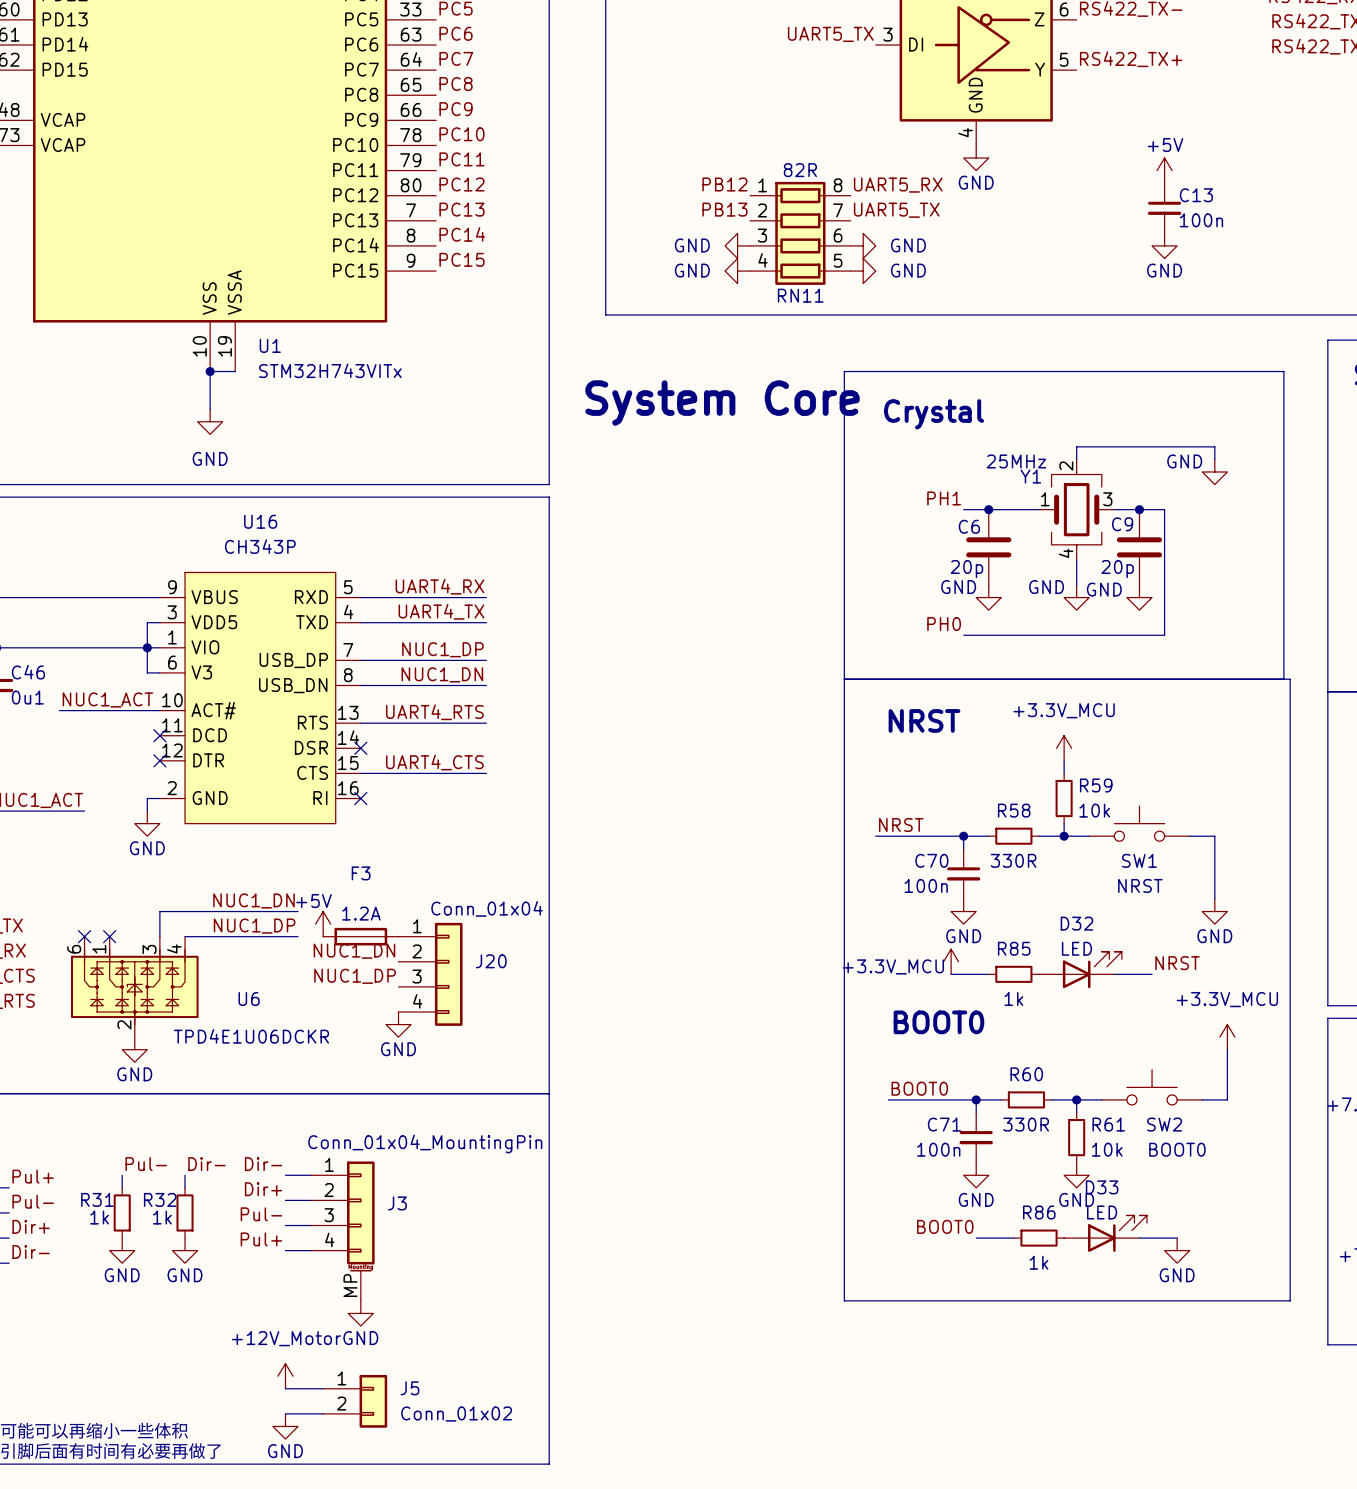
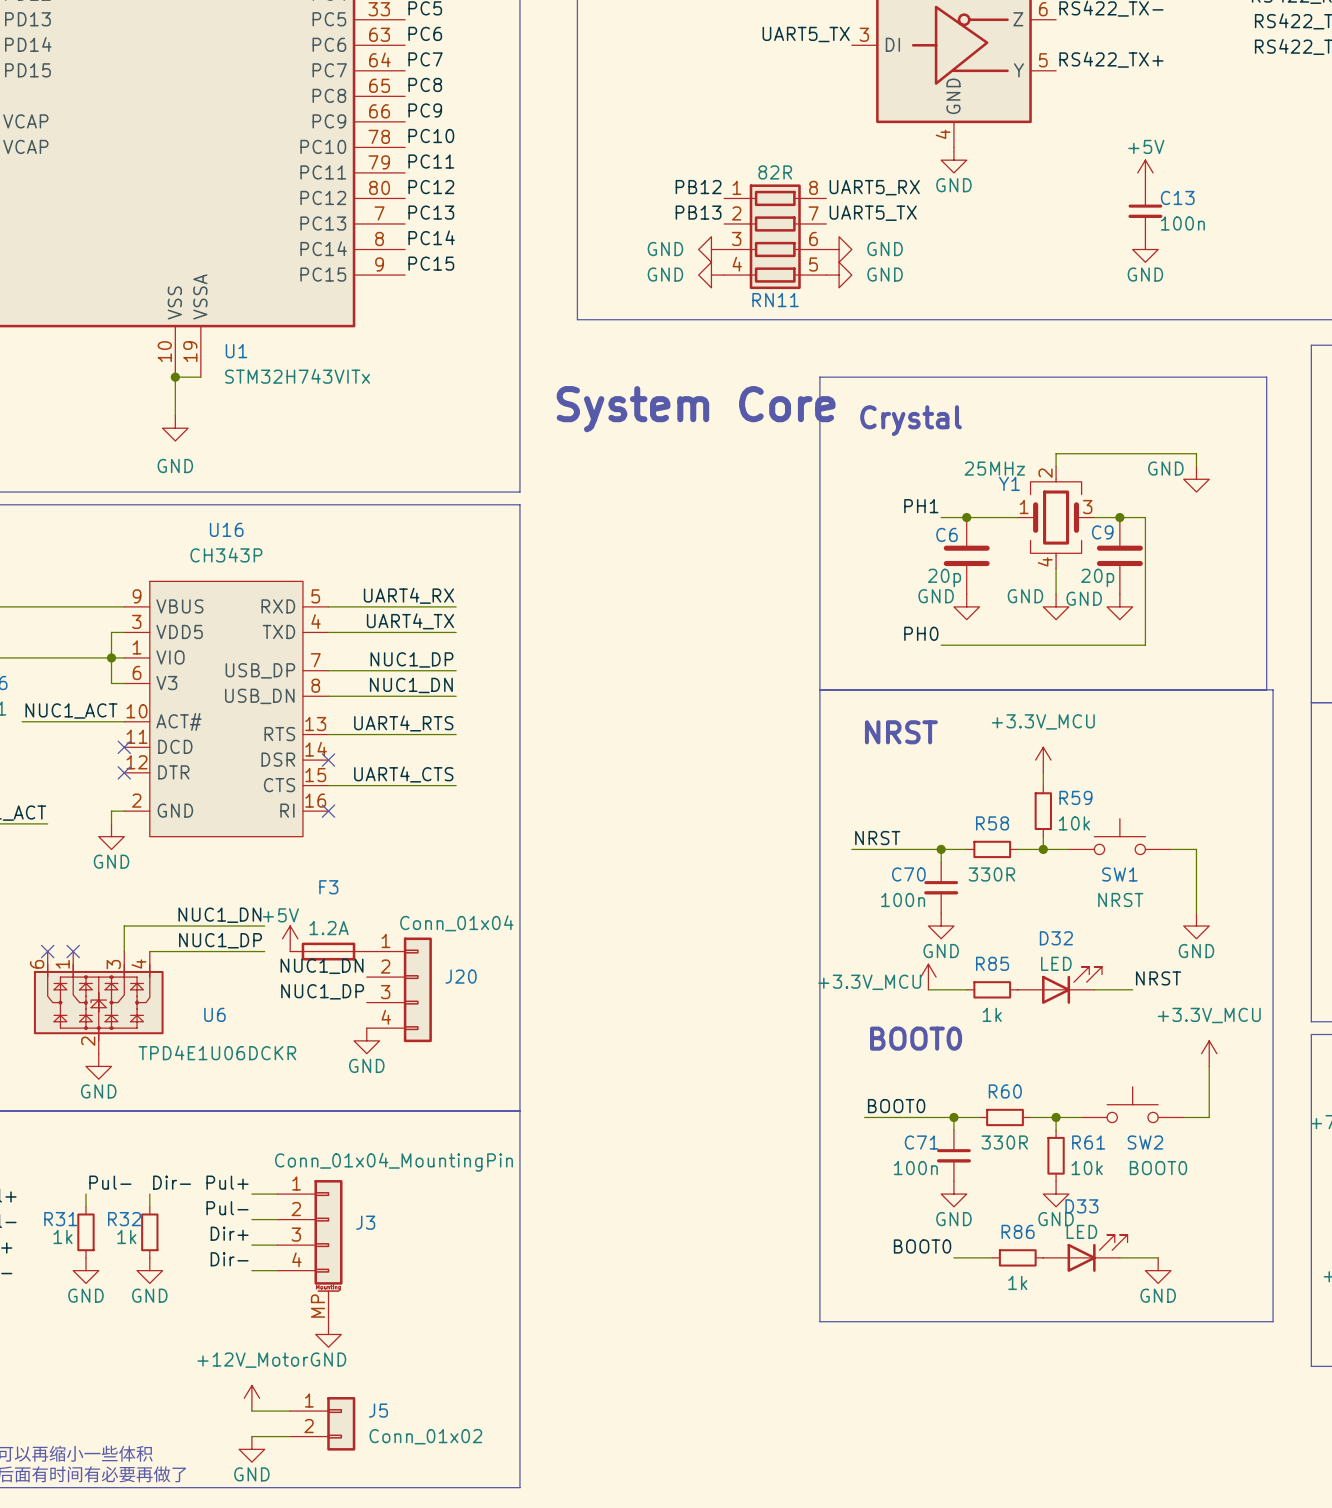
label: Dir- (263, 1164) -> Pul+ (227, 1182)
label: Dir+ (263, 1189) -> Pul- (227, 1208)
label: Pul- (261, 1214) -> Dir+ (229, 1233)
label: Pul+ (261, 1239) -> Dir- (229, 1259)

